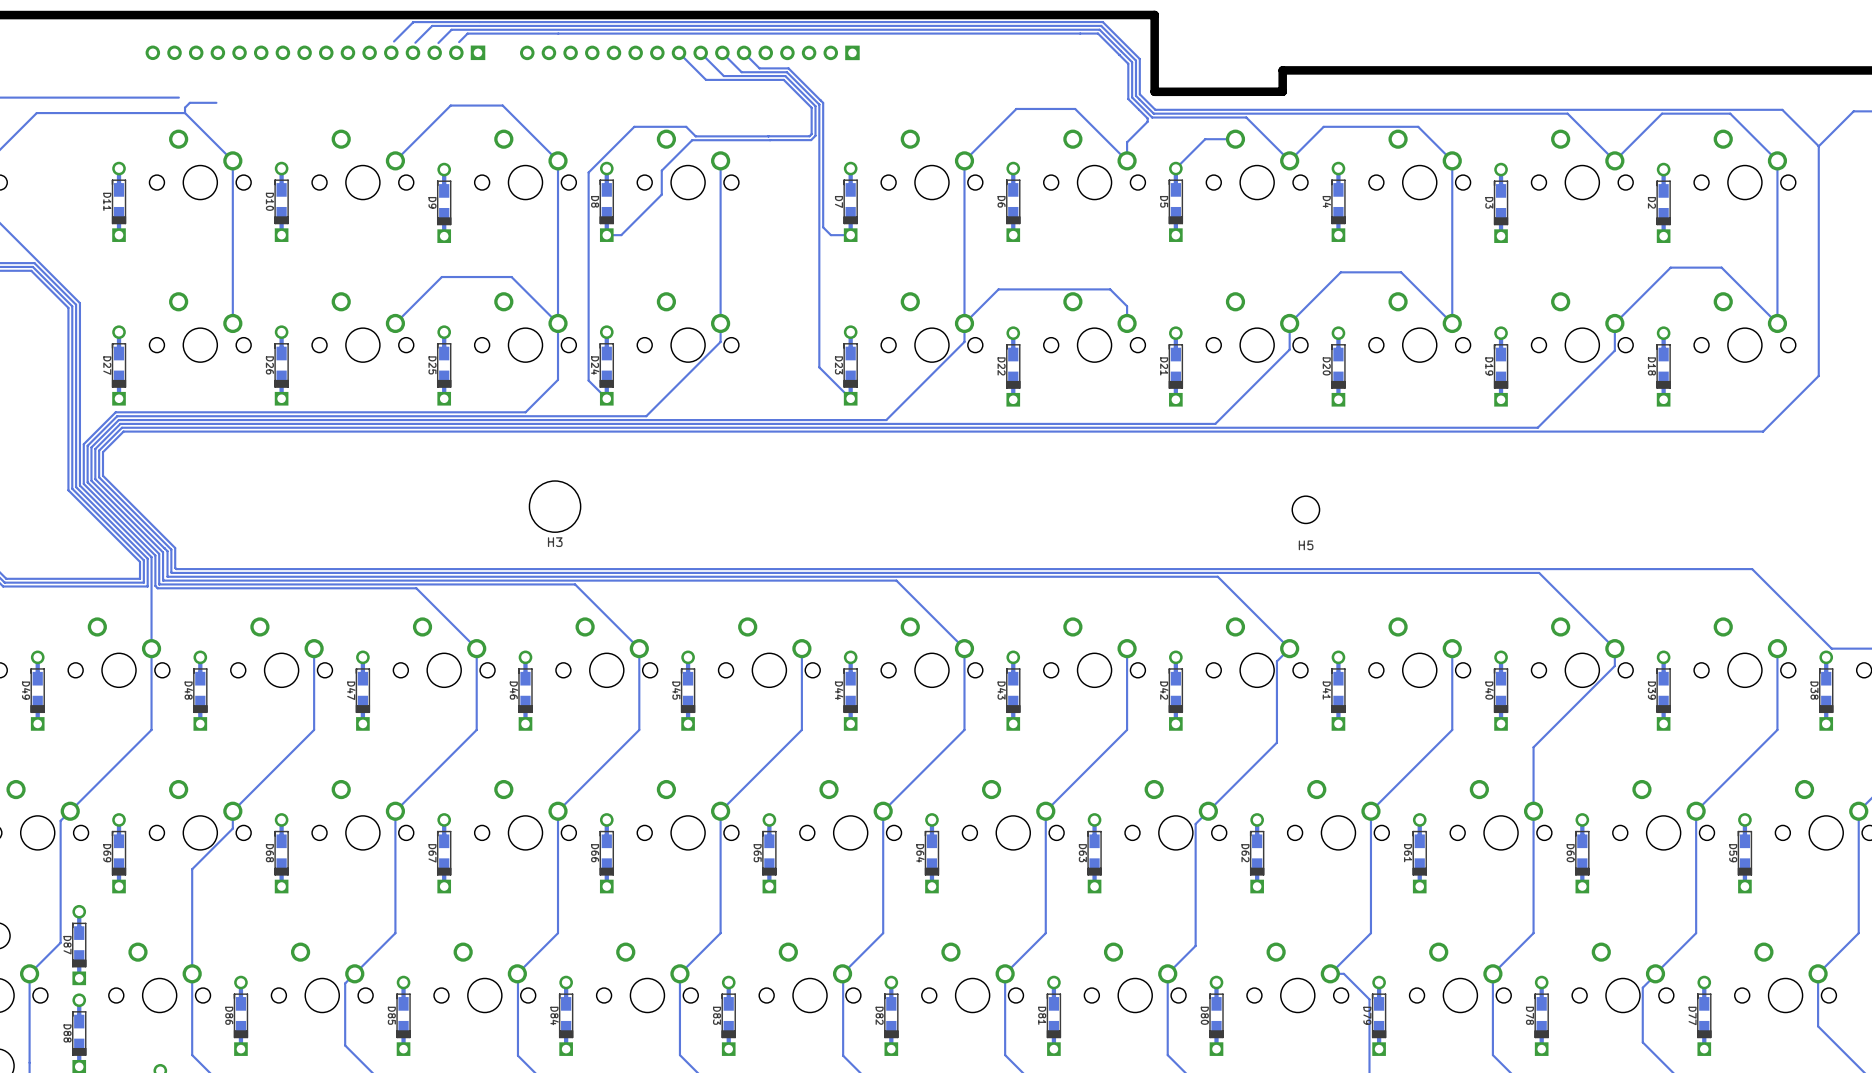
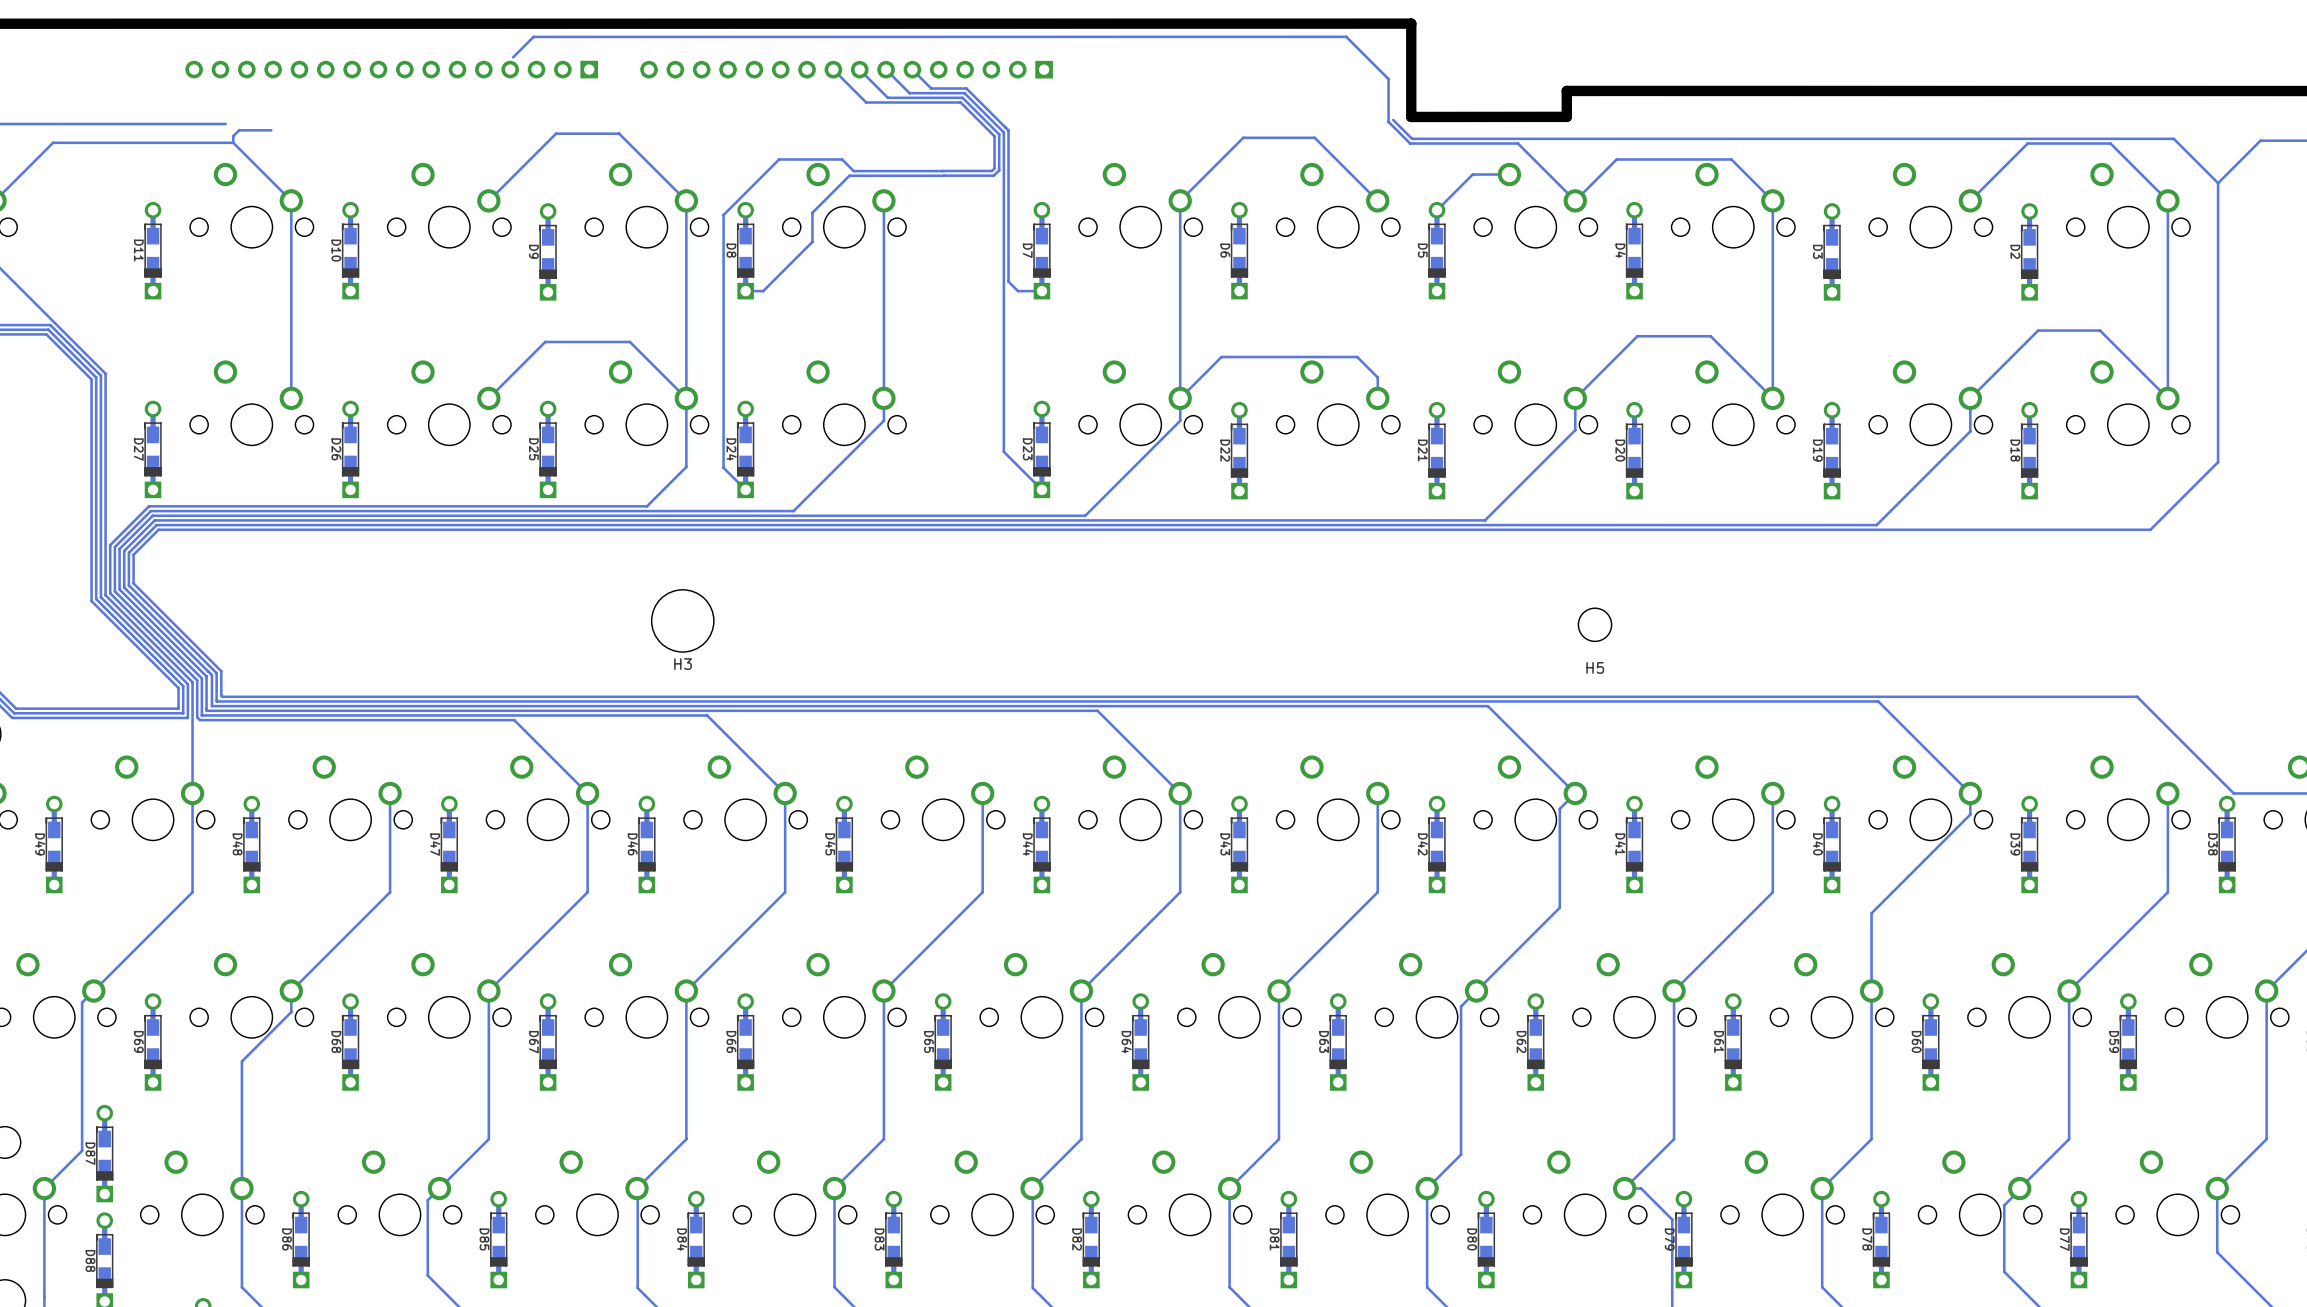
track: (394, 41) (413, 22) (1102, 22) (1139, 59) (1139, 94) -> none
track: (438, 42) (451, 29) (1099, 29) (1132, 62) (1132, 97) (1152, 117) (1246, 117) -> none
track: (459, 42) (467, 33) (1098, 33) (1128, 63) (1128, 99) (1147, 118) (1147, 121) (1127, 142) (1127, 160) -> none
track: (1242, 113) (1567, 113) (1614, 160) -> (1517, 143) (1522, 148)

